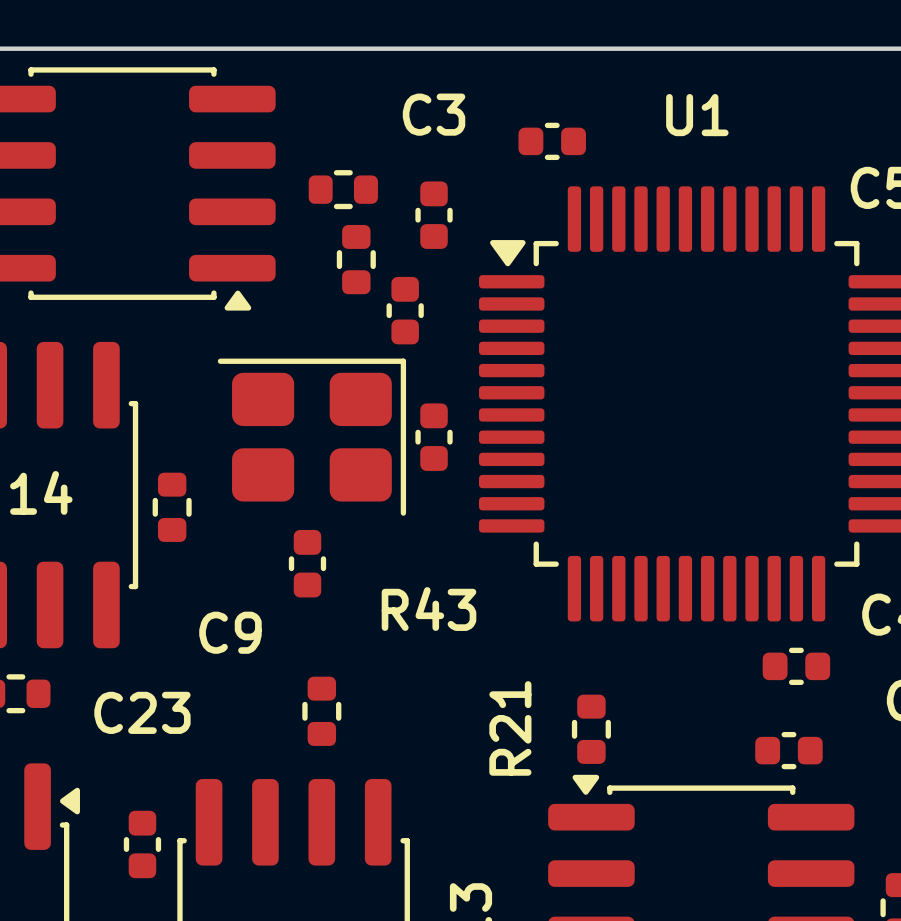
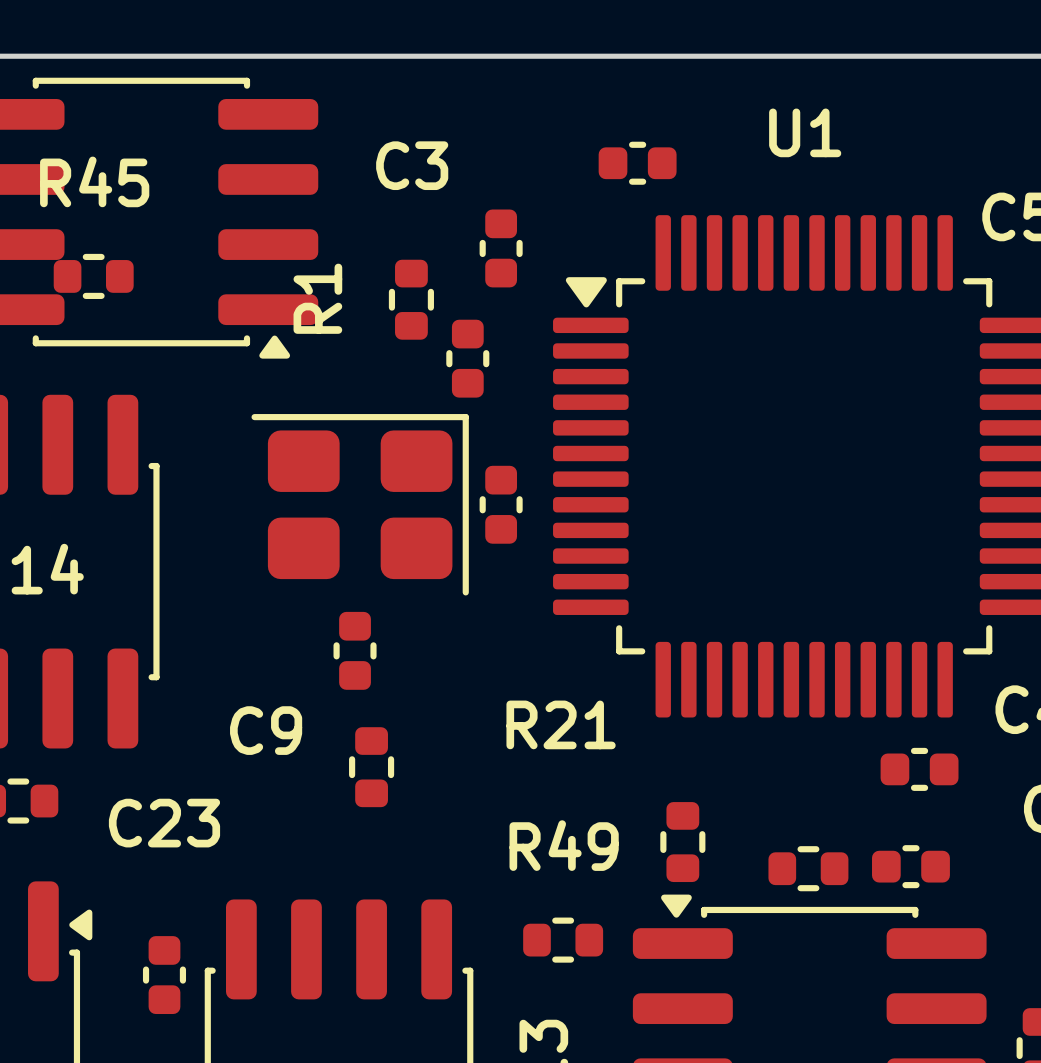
C3 name position: C3 (434, 114) -> C3 (412, 165)
part: (343, 189) -> none
R45: none -> (93, 276)
R1 name: none -> R1 (317, 298)
part: (172, 507) -> none
part: none -> (371, 767)
R43: (321, 711) -> none
R21 name rotation: 0° (510, 728) -> 90° clockwise (561, 724)
part: none -> (808, 868)
R49: none -> (563, 940)

